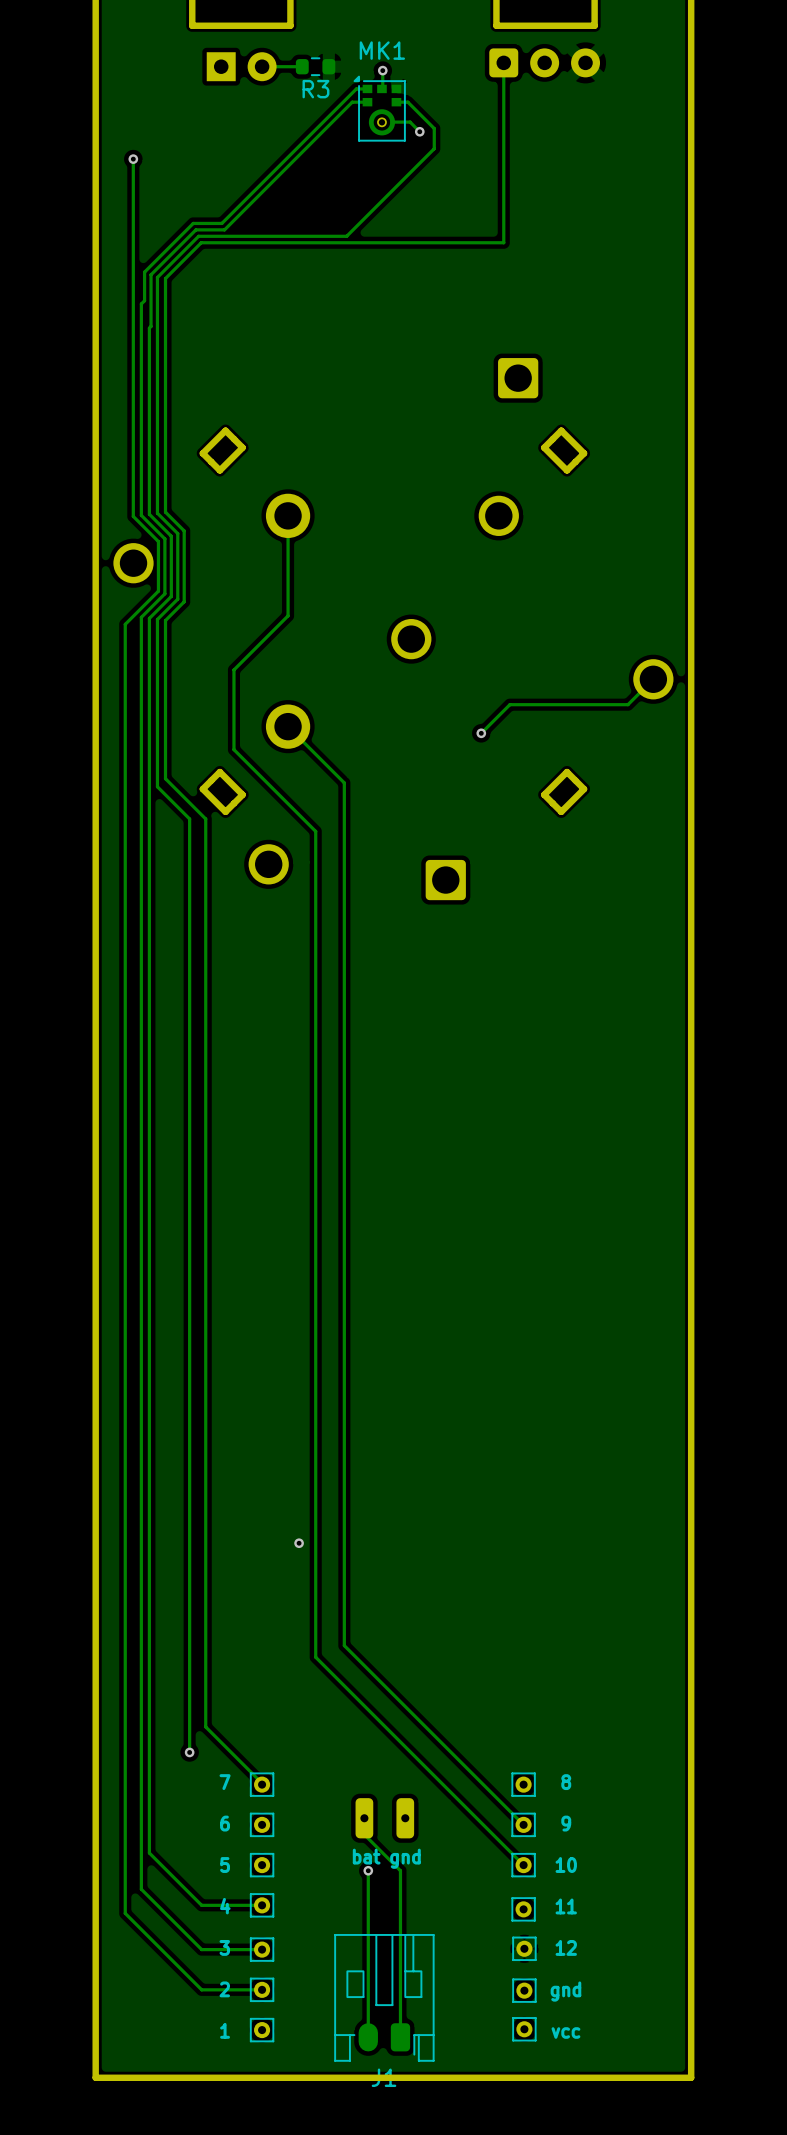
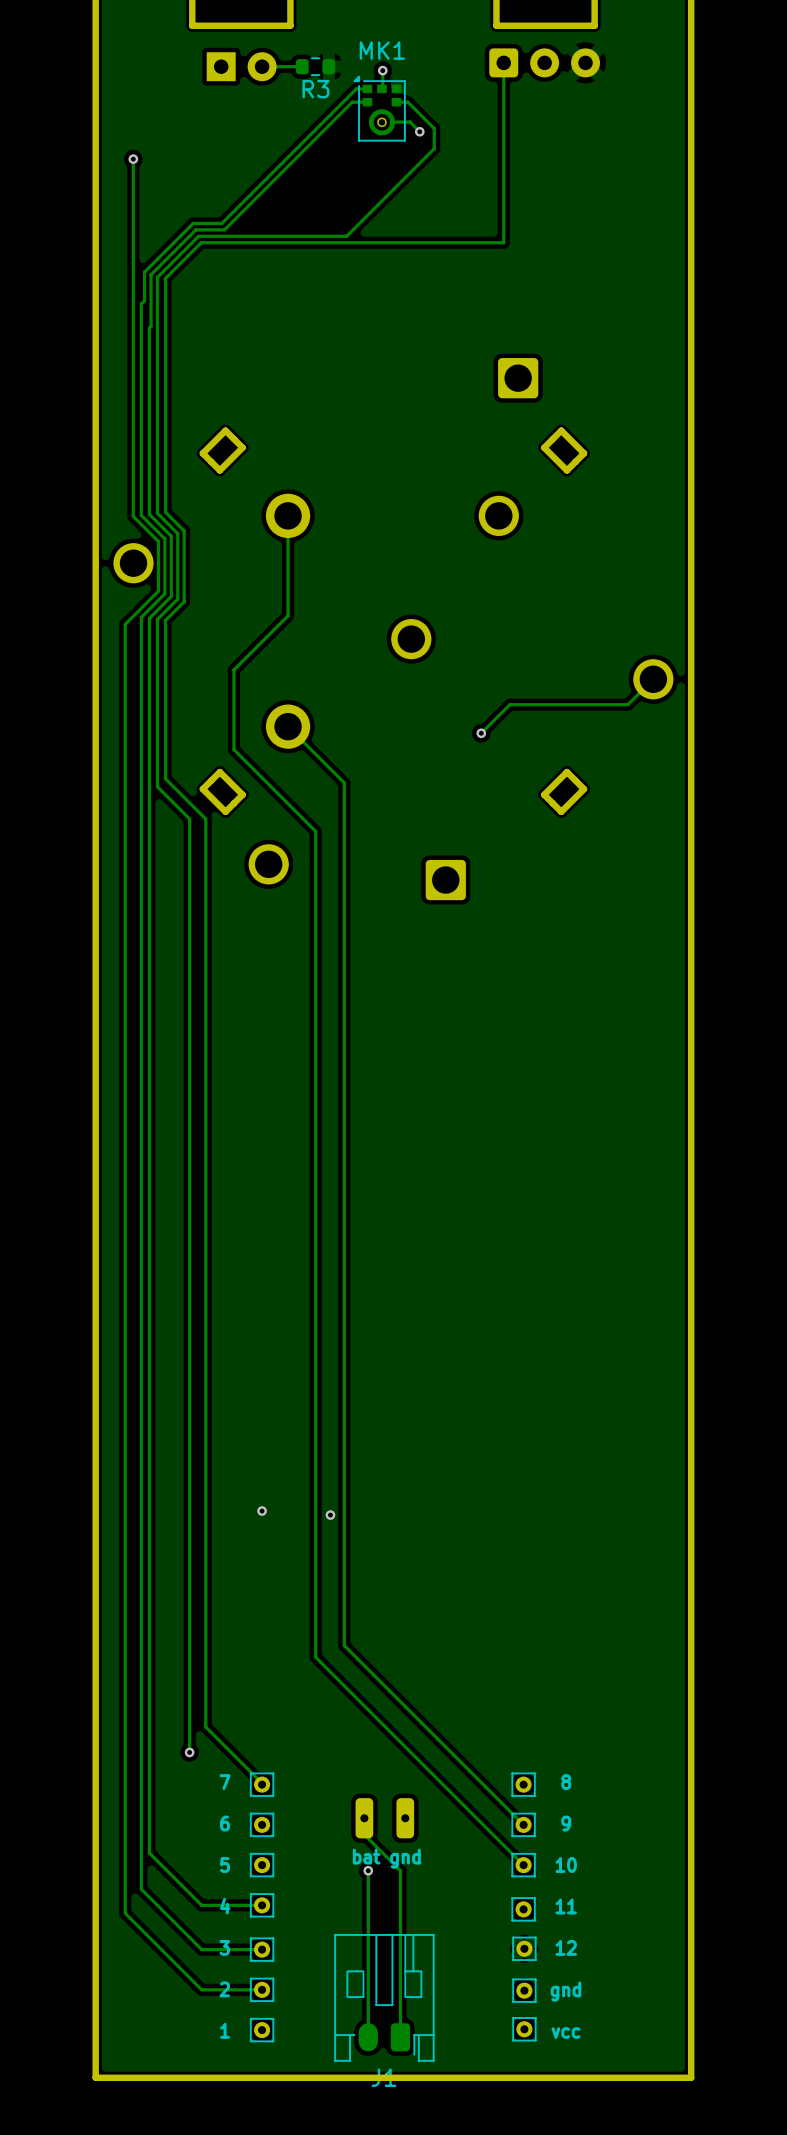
via: none -> (262, 1511)
via: none -> (330, 1515)
via: (299, 1543) -> none

